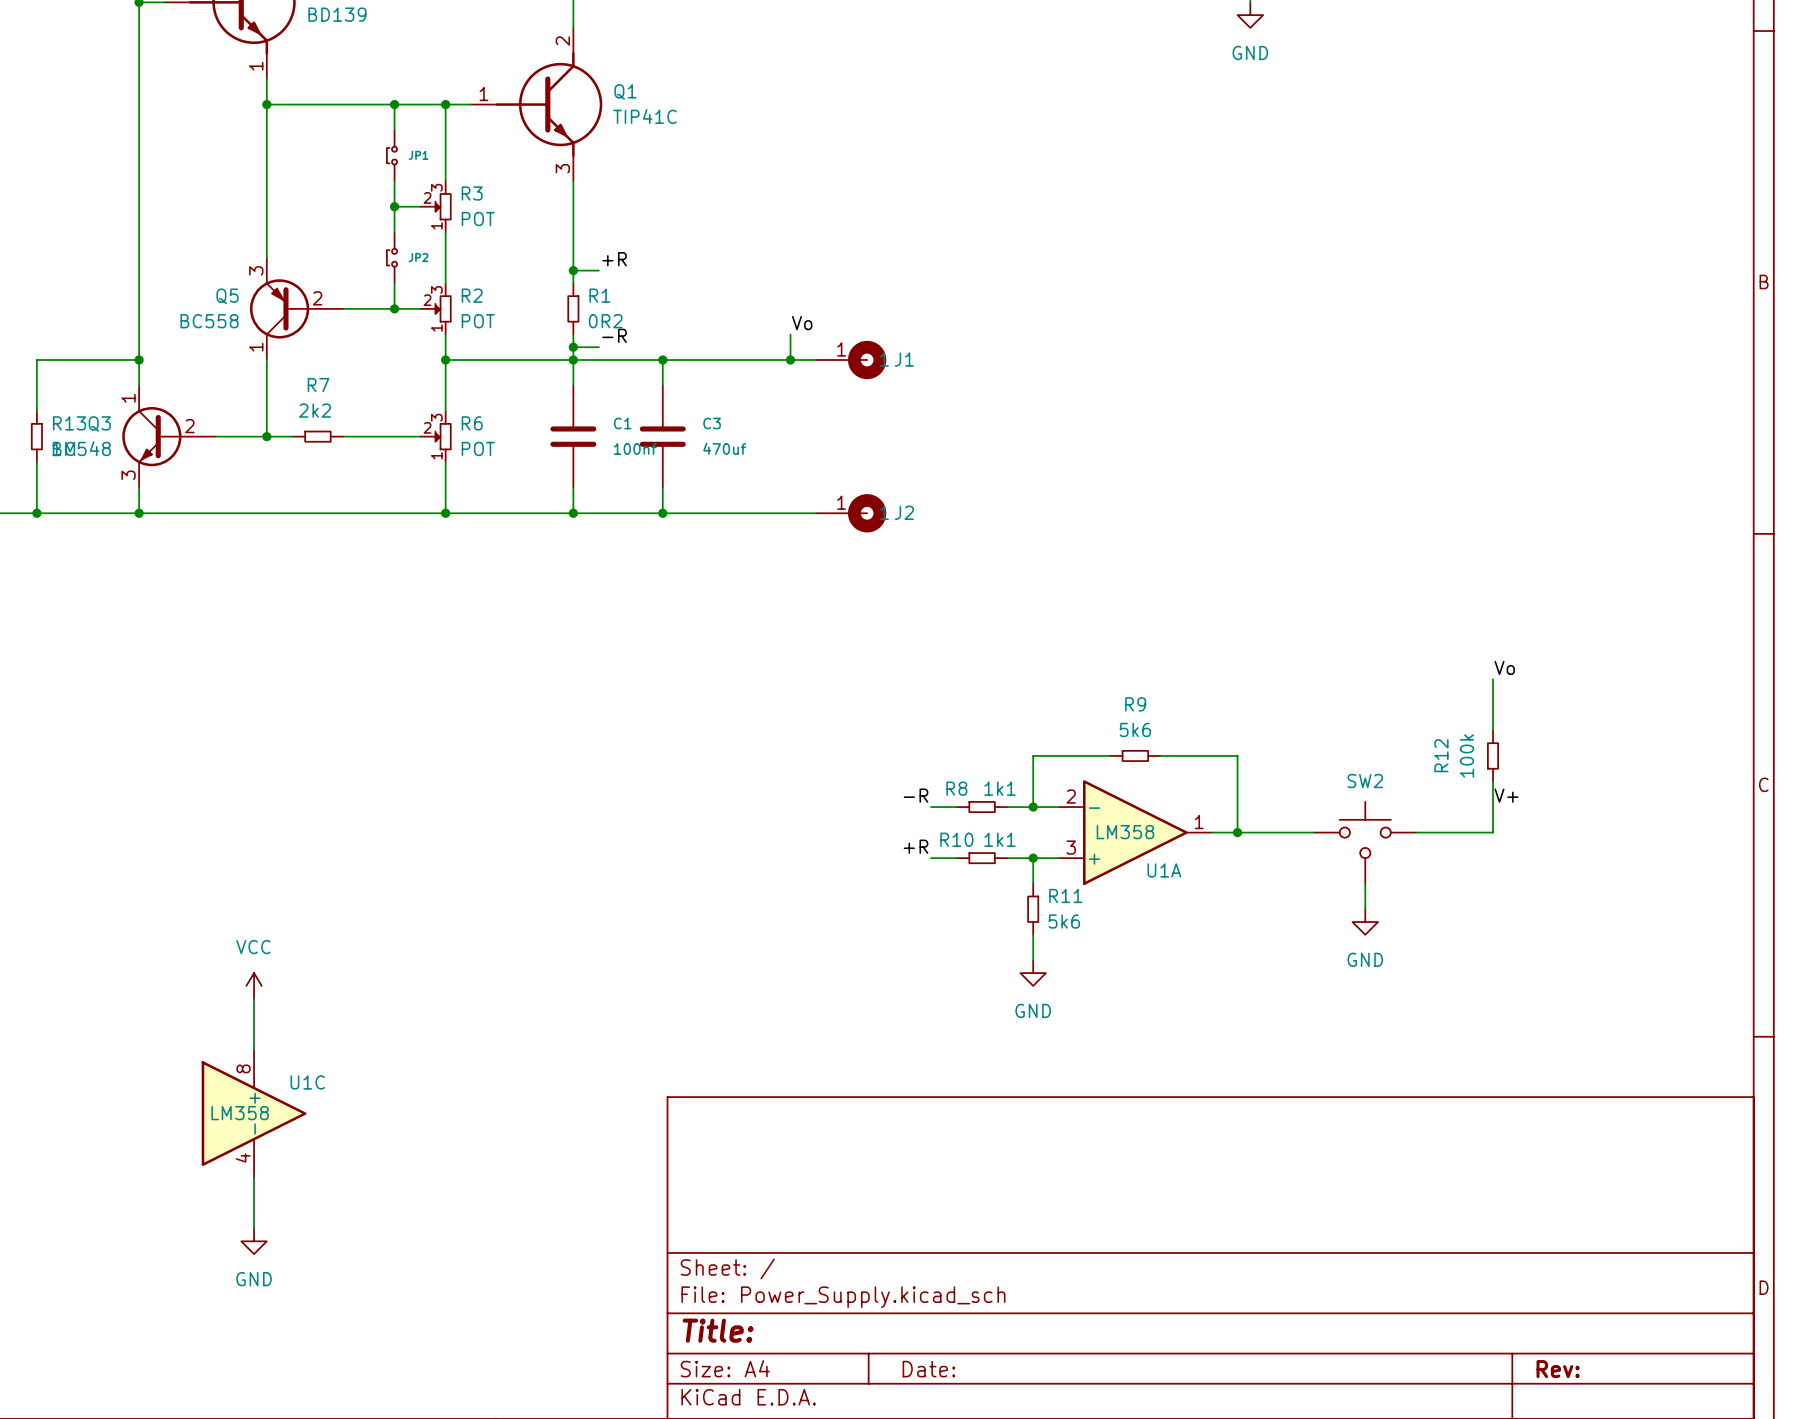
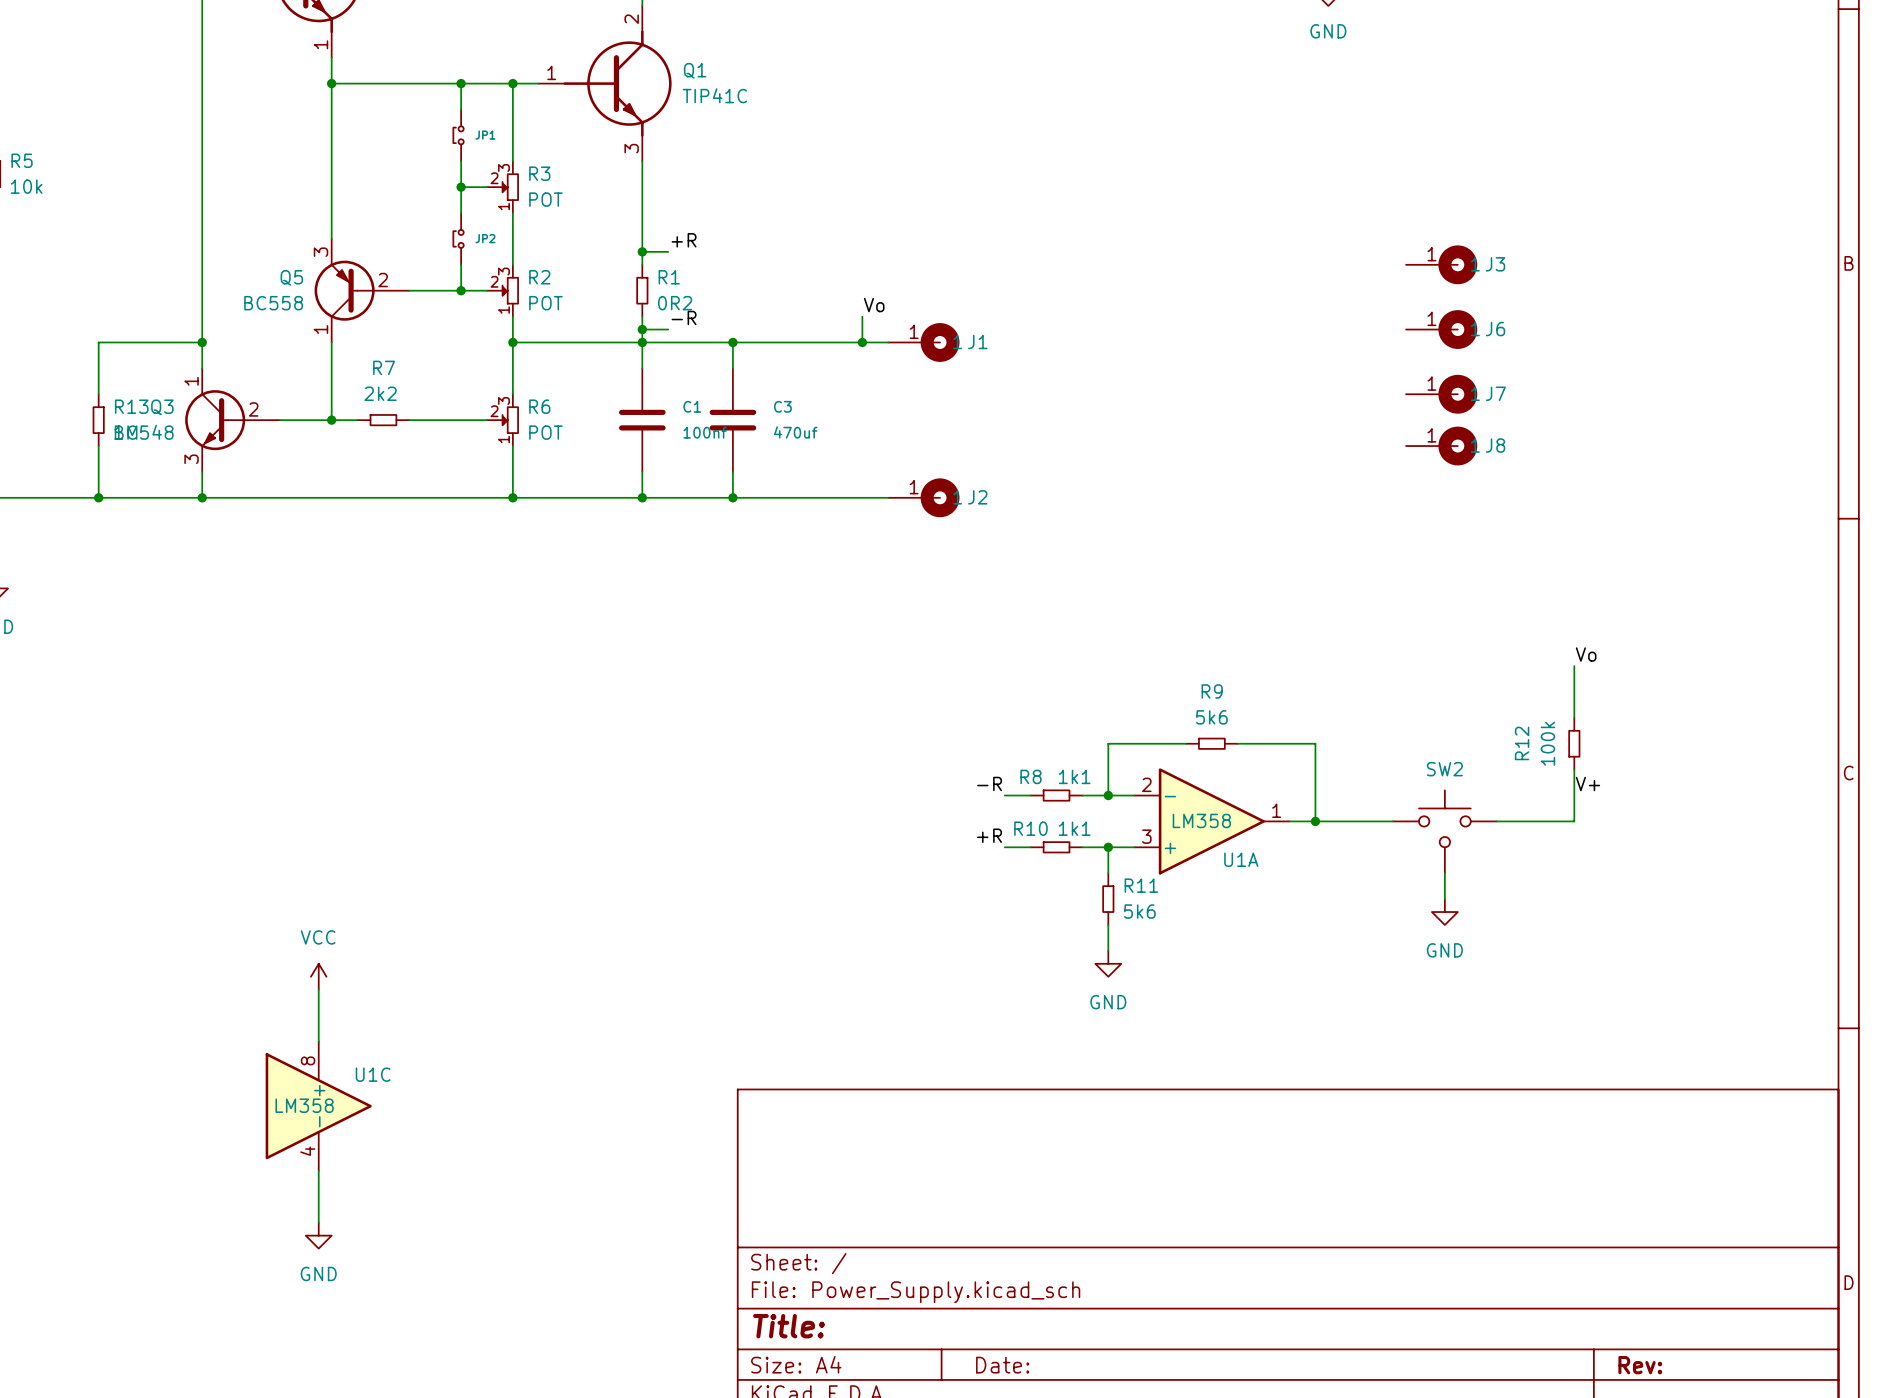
J3: none -> (1441, 264)
J6: none -> (1441, 329)
J7: none -> (1441, 394)
J8: none -> (1441, 446)

